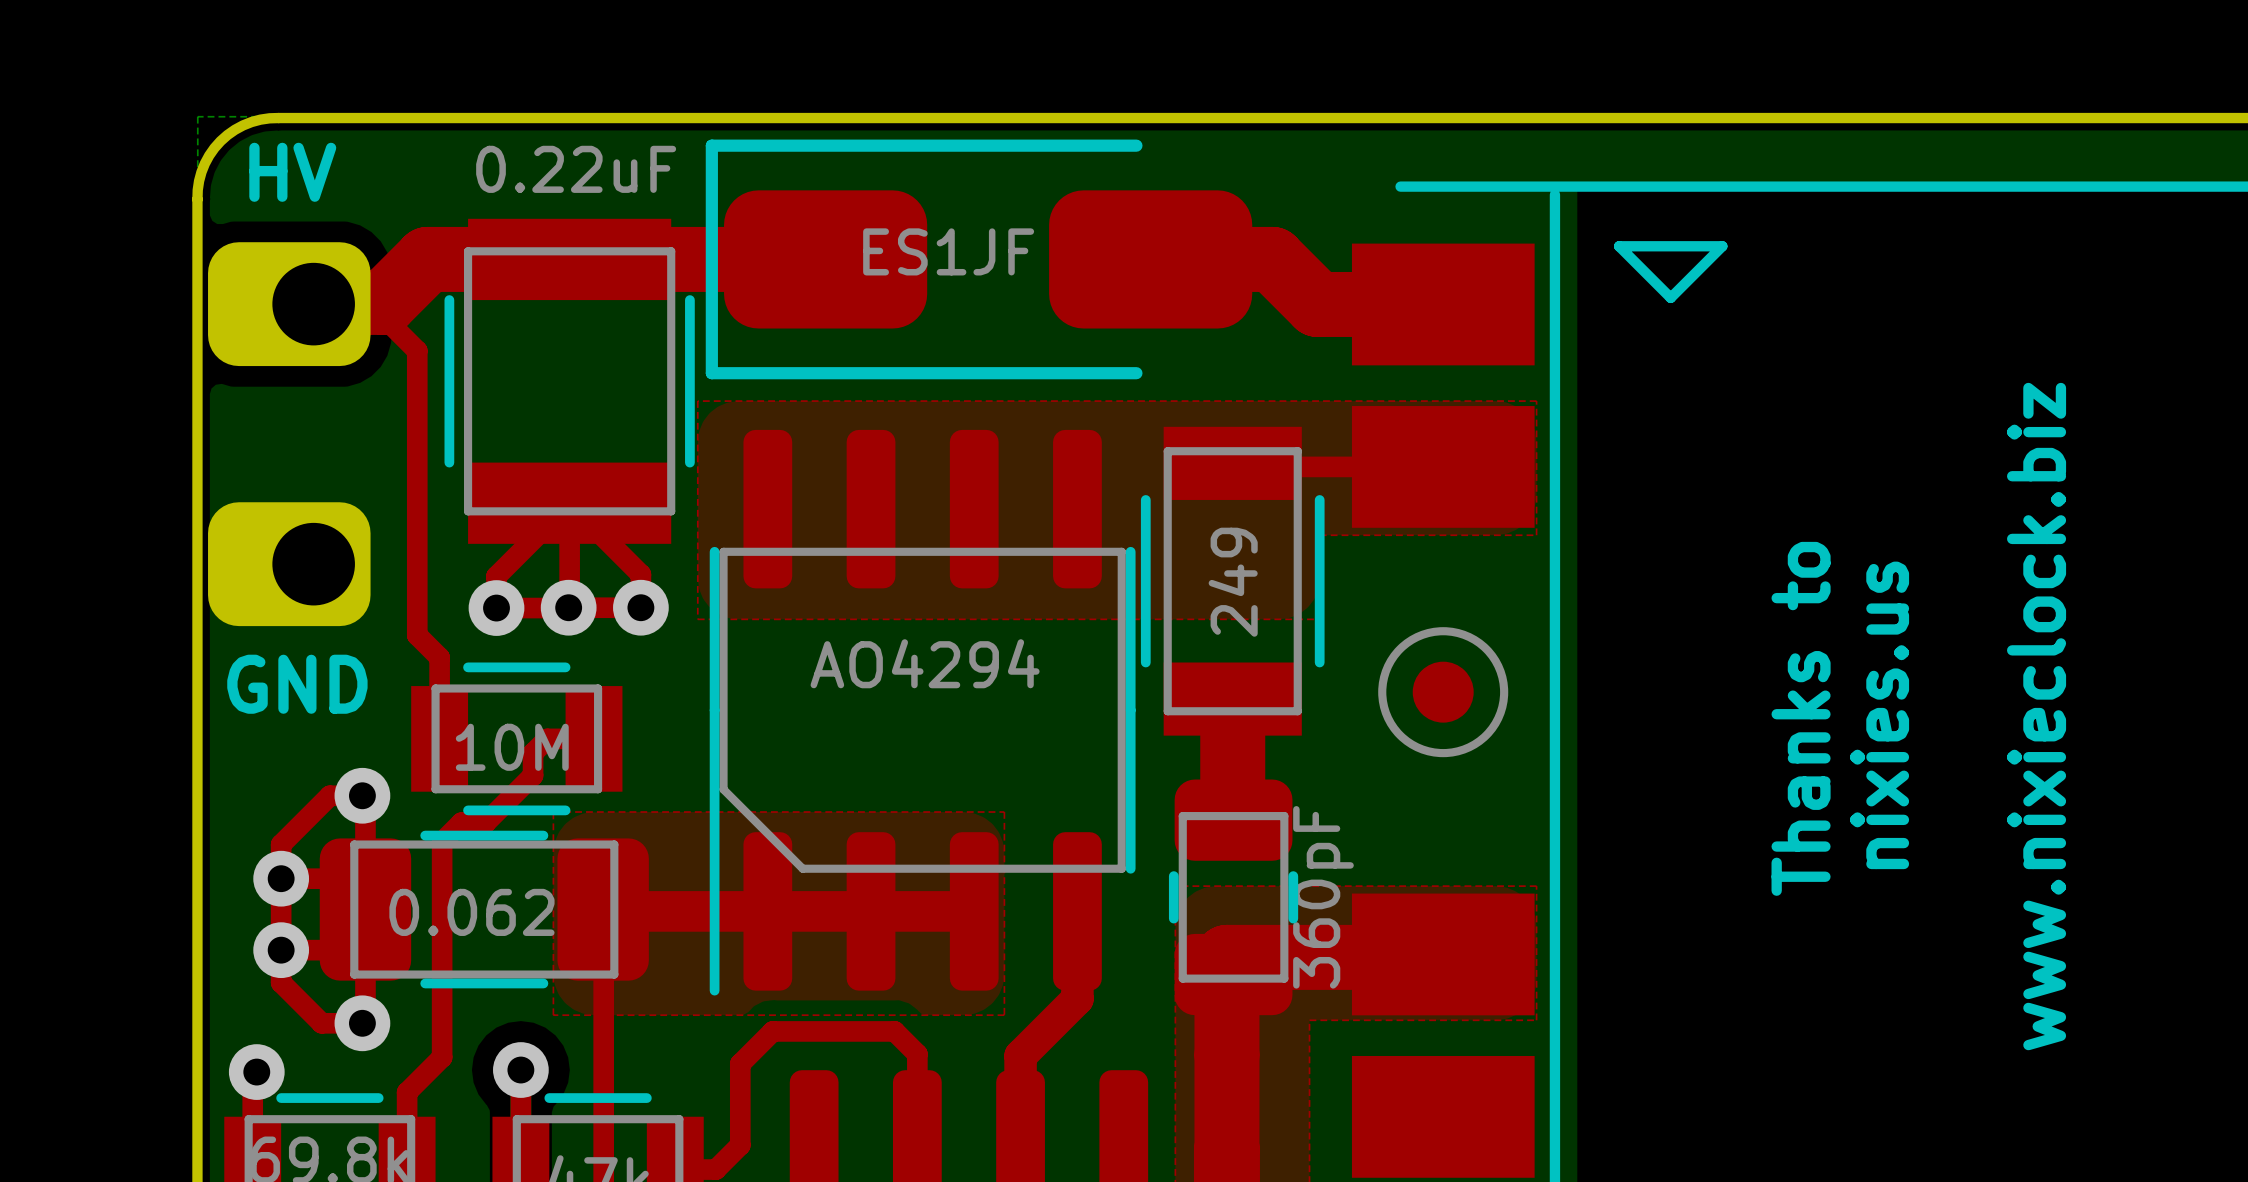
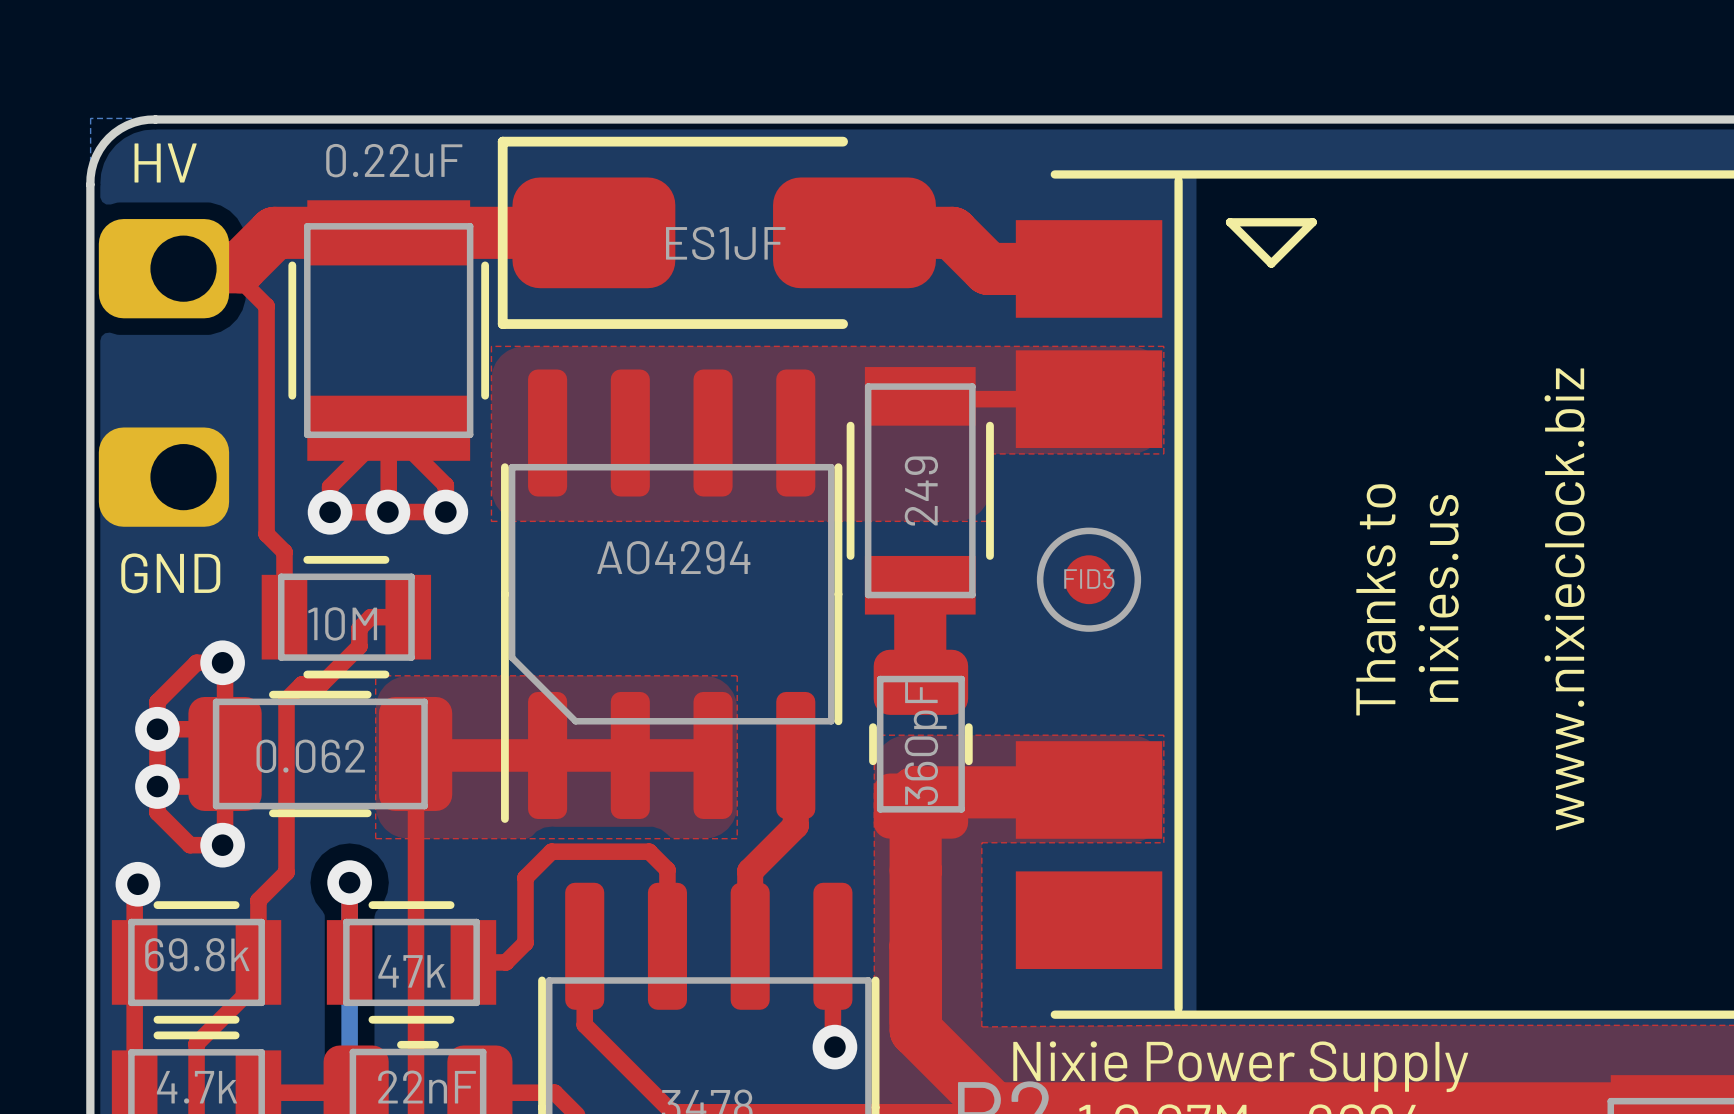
part footprint: [705, 139, 1253, 380] -> [497, 136, 936, 329]
FID3 name: none -> FID3 (1089, 579)
part value position: 360pF (1323, 897) -> 360pF (925, 743)

